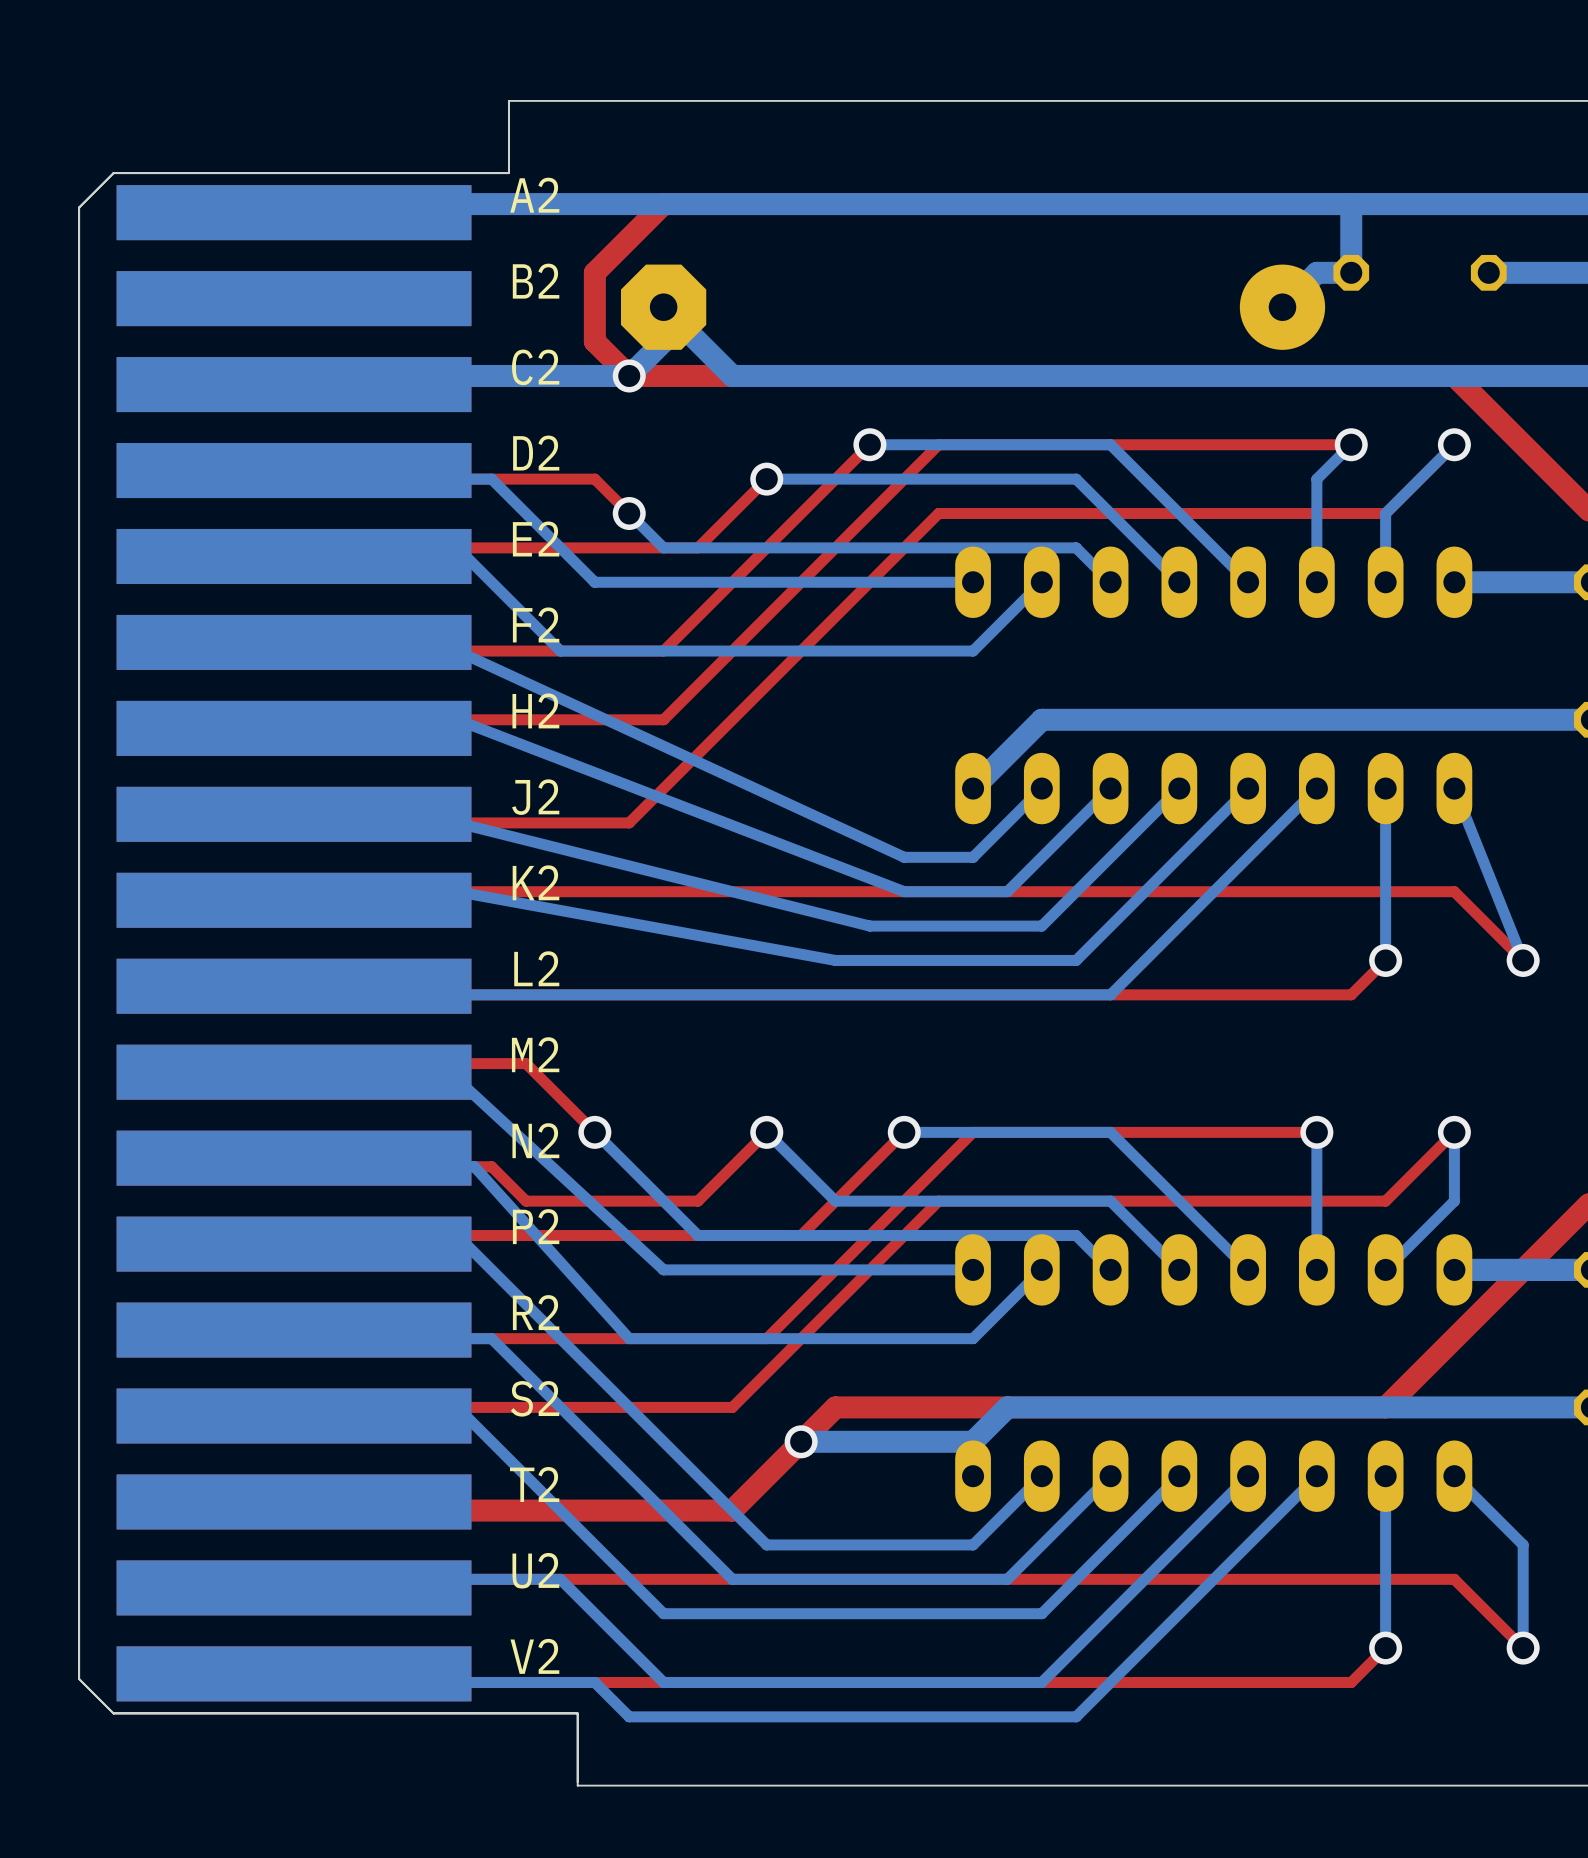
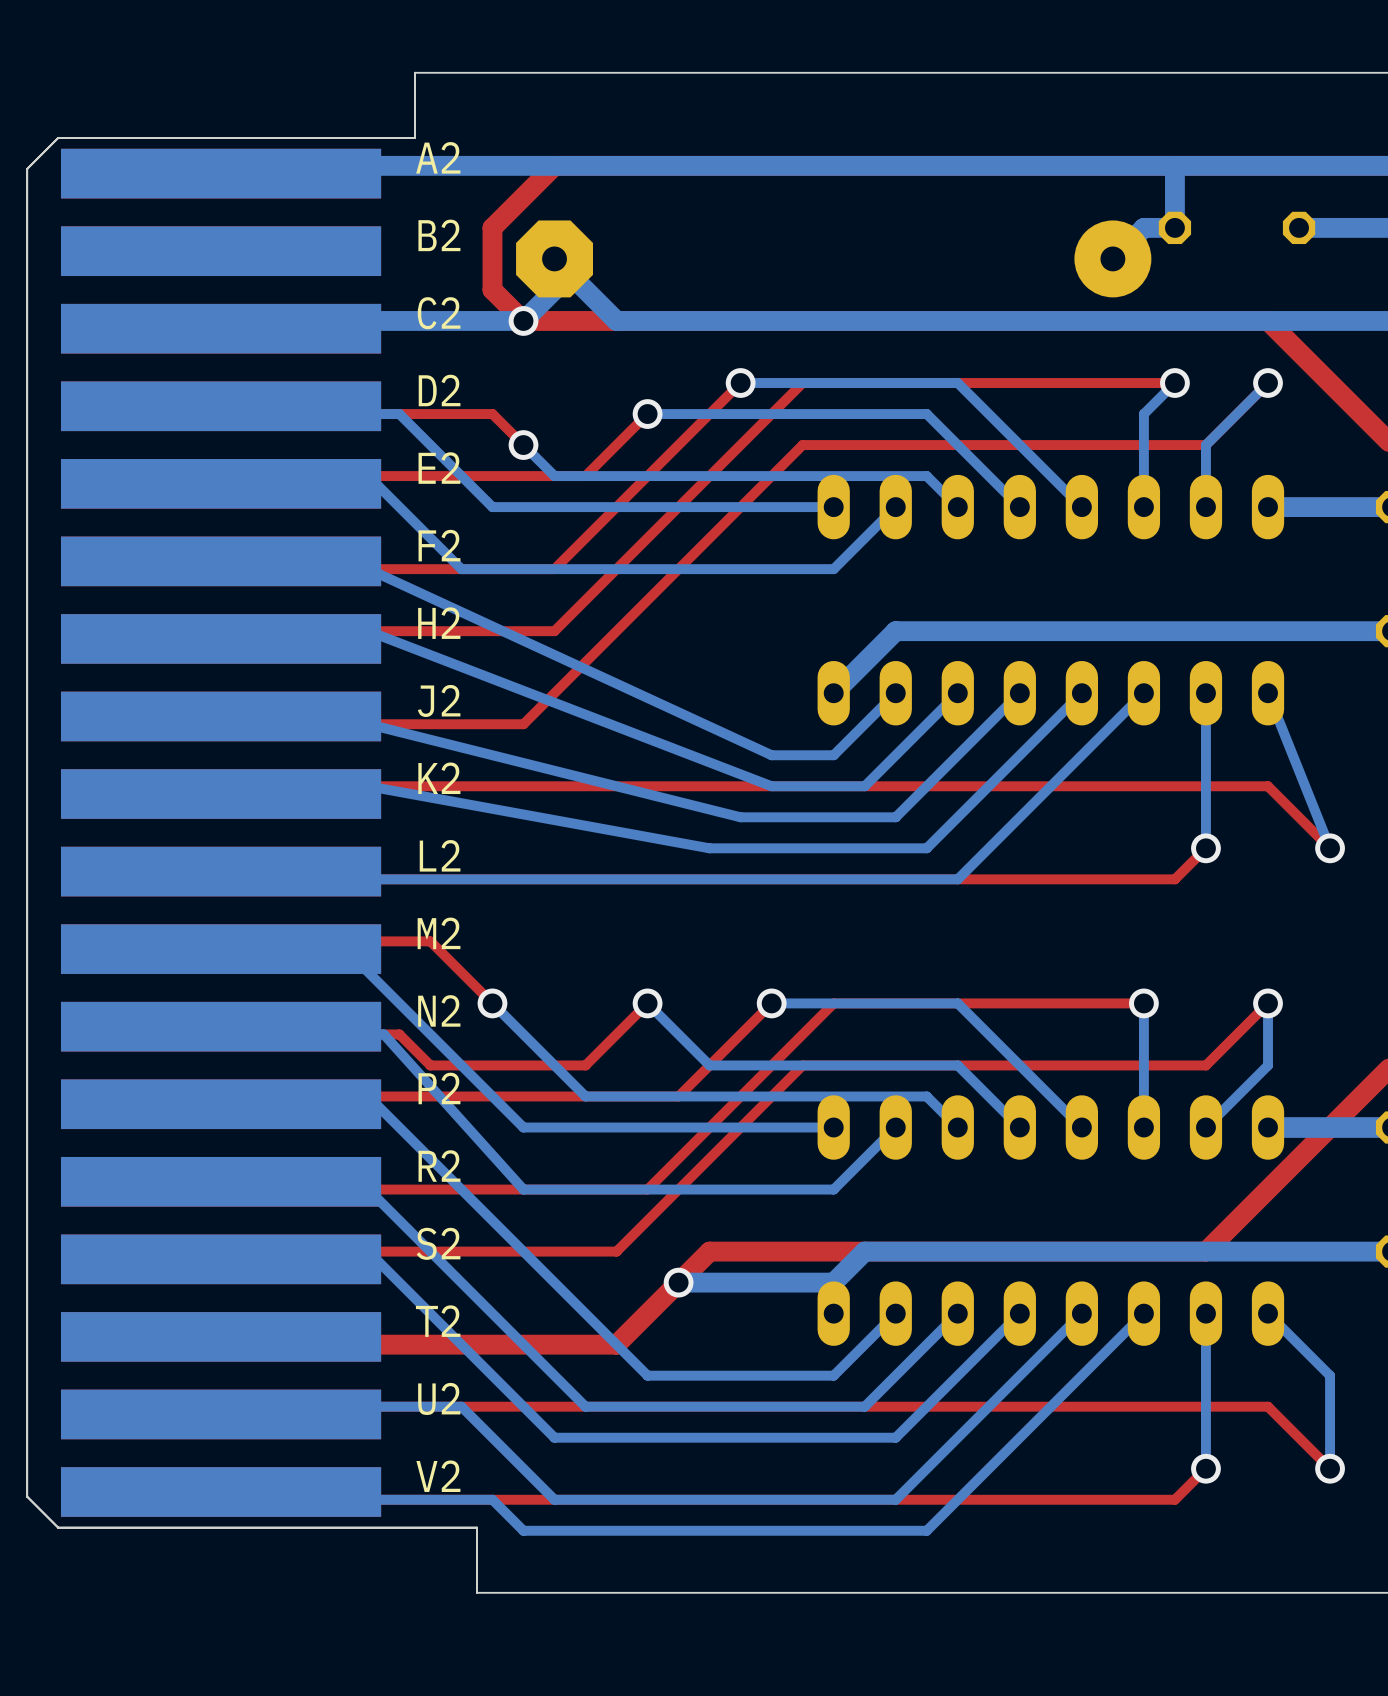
bottom track: (422, 1063) (440, 1063) (663, 1269) -> (337, 941) (523, 1127) (554, 1127)
bottom track: (457, 1338) (491, 1338) (732, 1579) -> (368, 1189) (585, 1406) (616, 1406)

